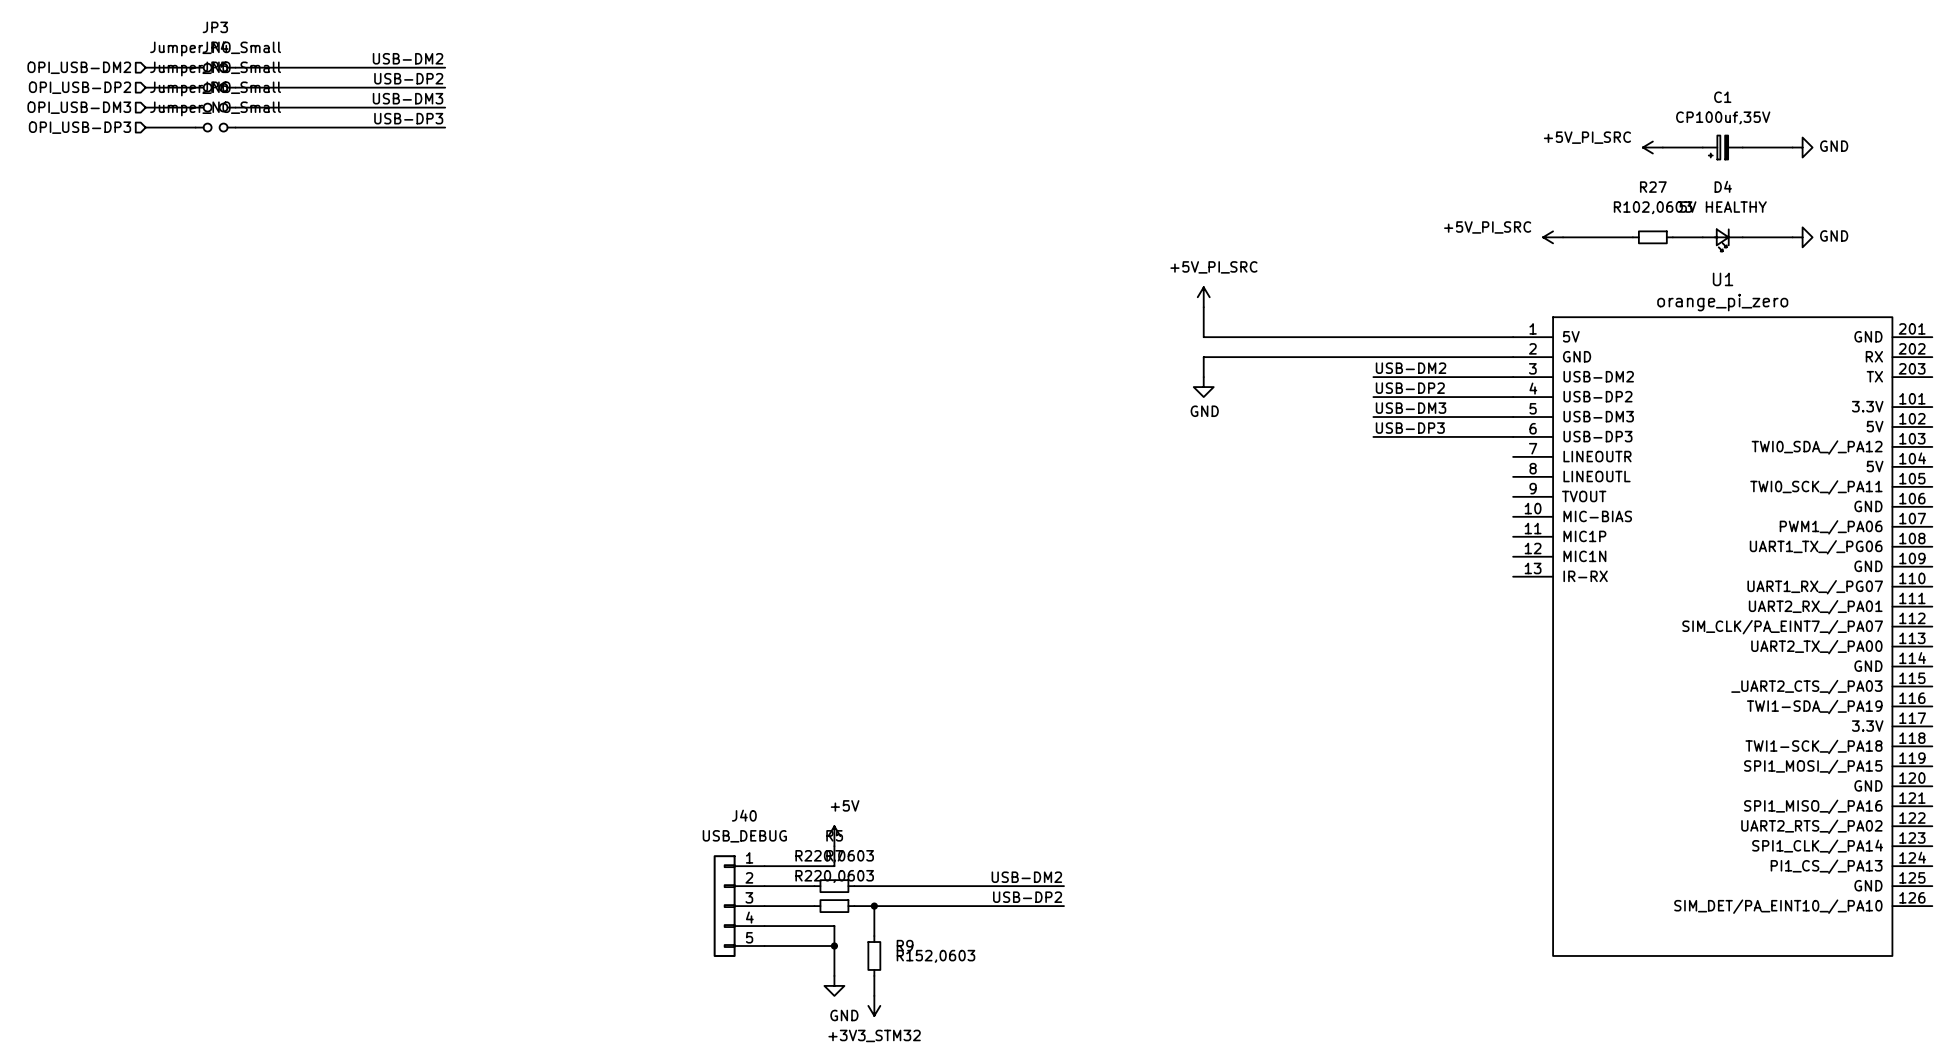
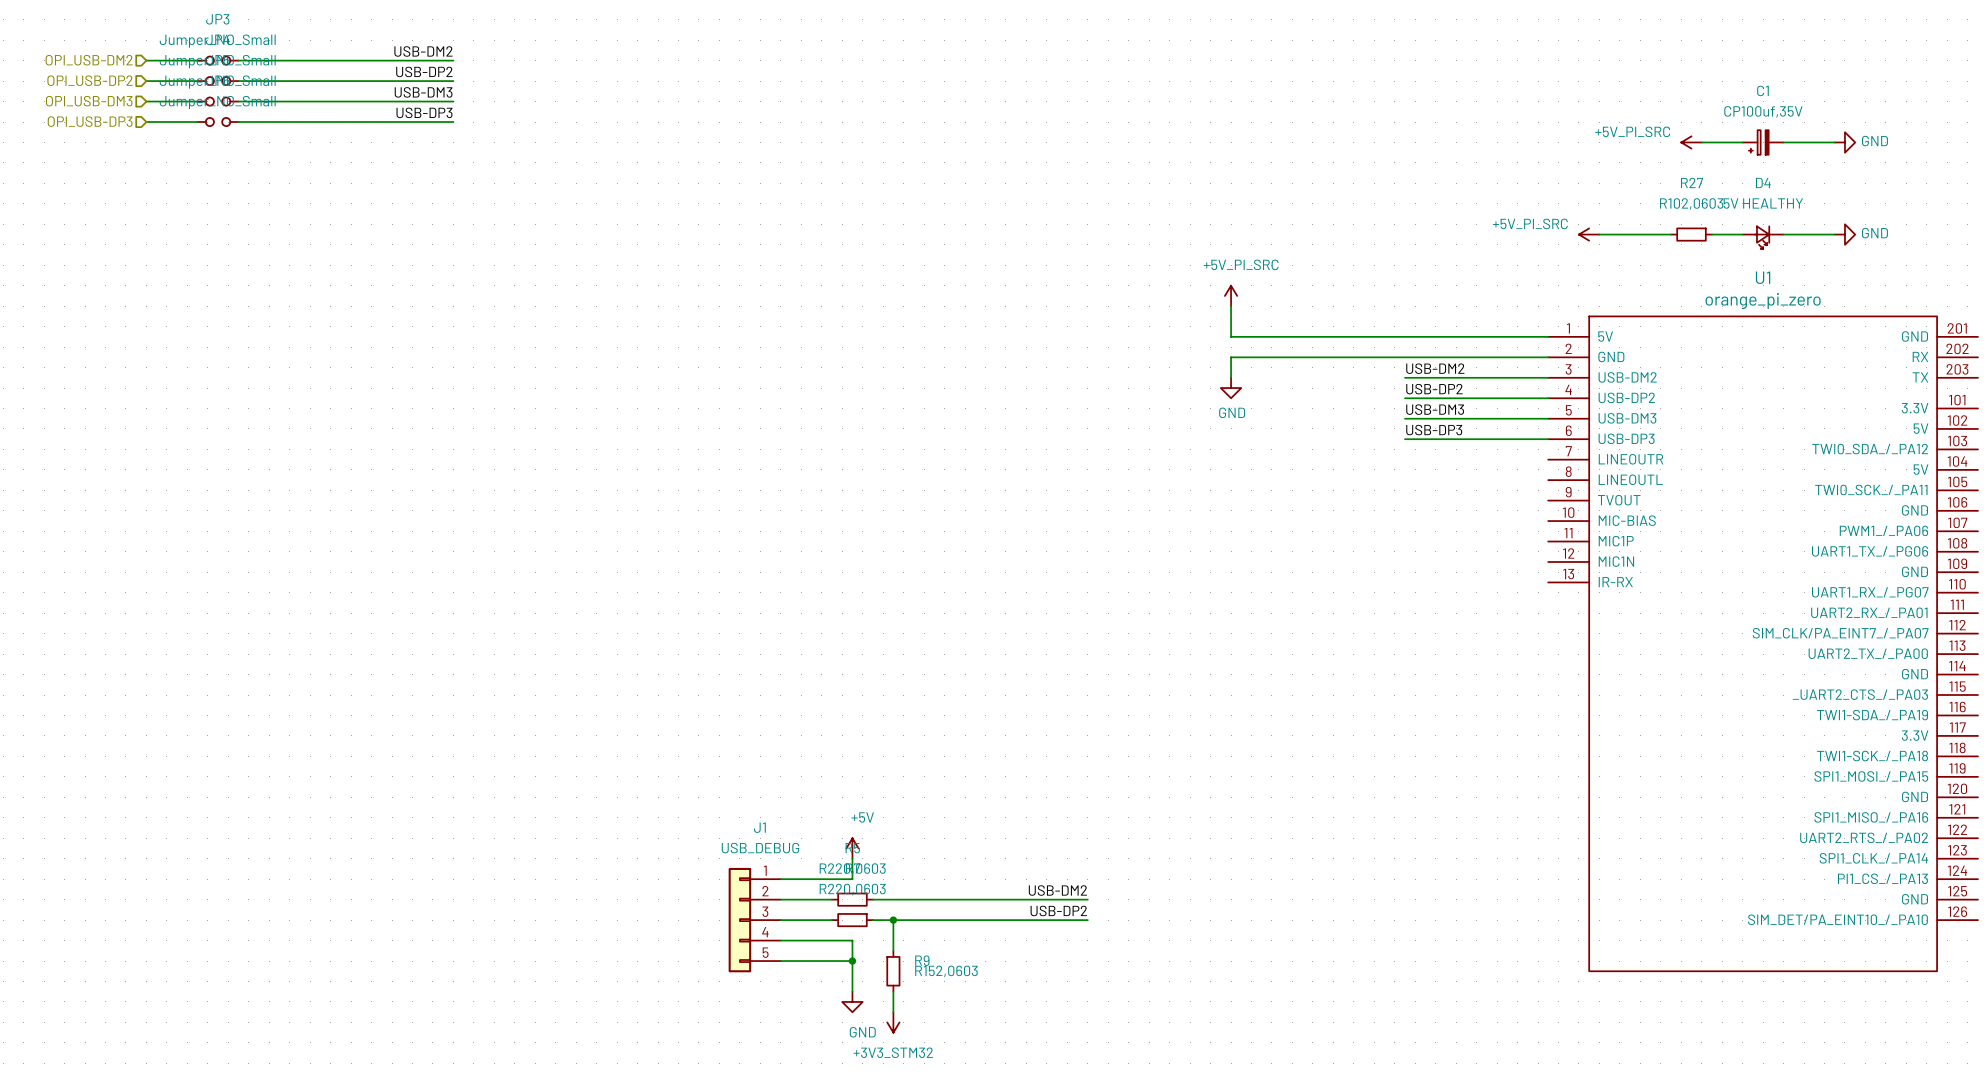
J40 name: J40 (744, 815) -> J1 (759, 827)

